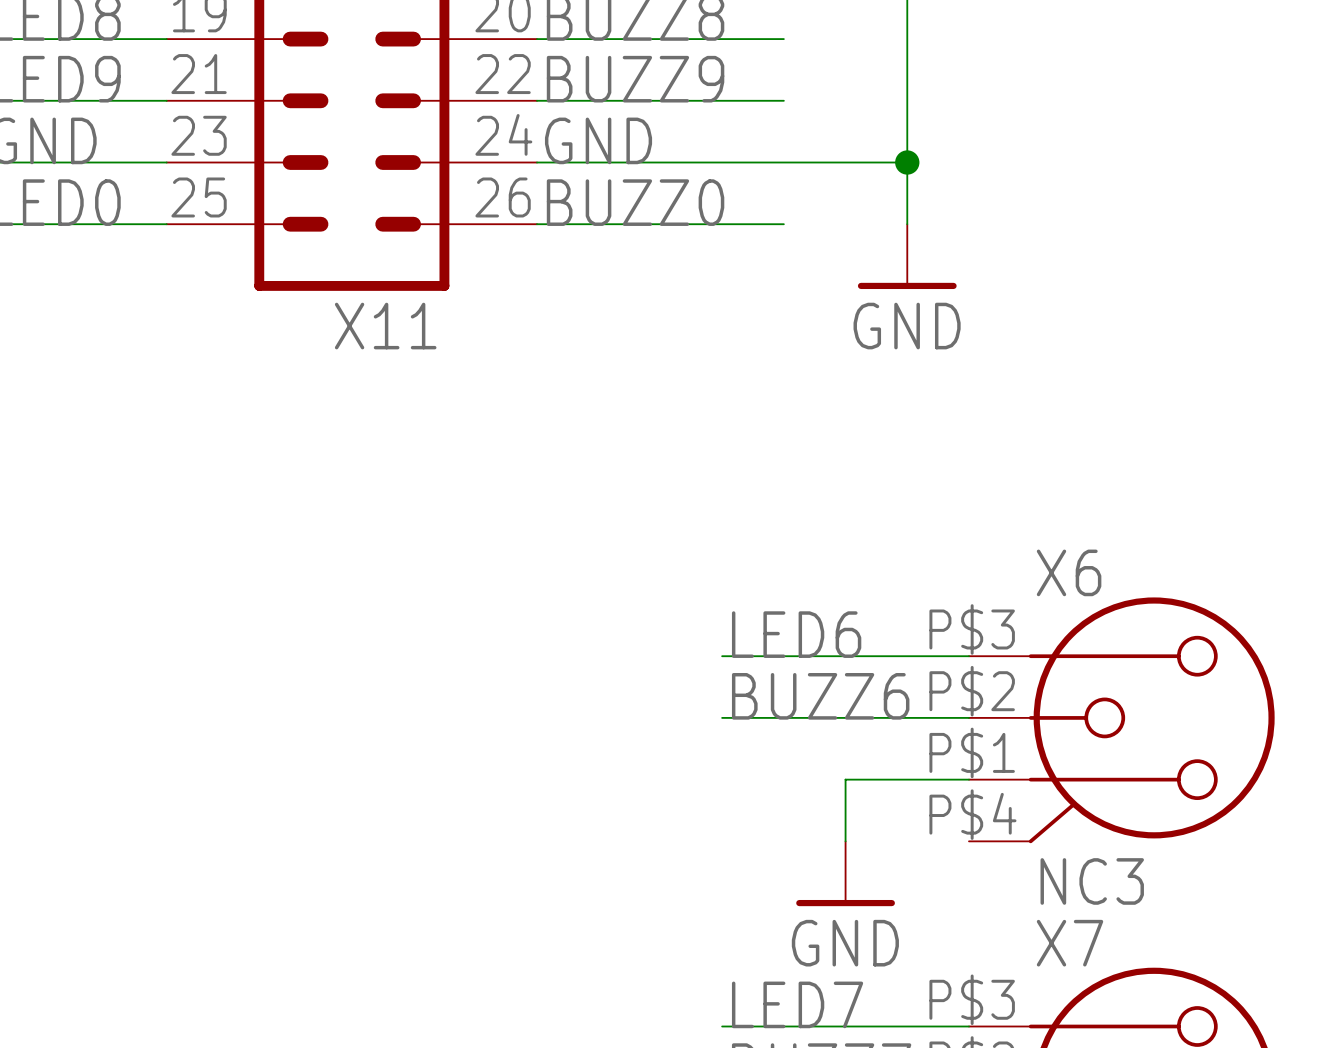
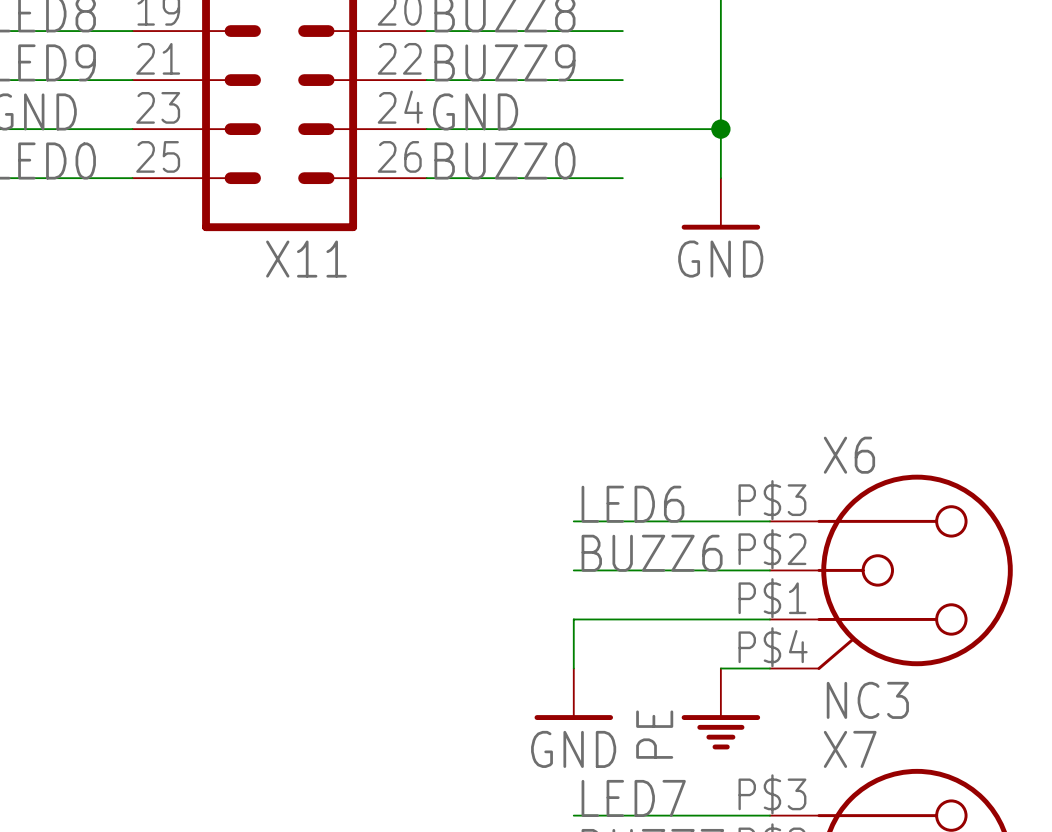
wire: (845, 779) (845, 841) -> (671, 619) (573, 619) (573, 668)
wire: none -> (720, 668) (769, 668)
power symbol position: GND (845, 873) -> GND (573, 694)
power symbol: none -> PE (720, 708)

